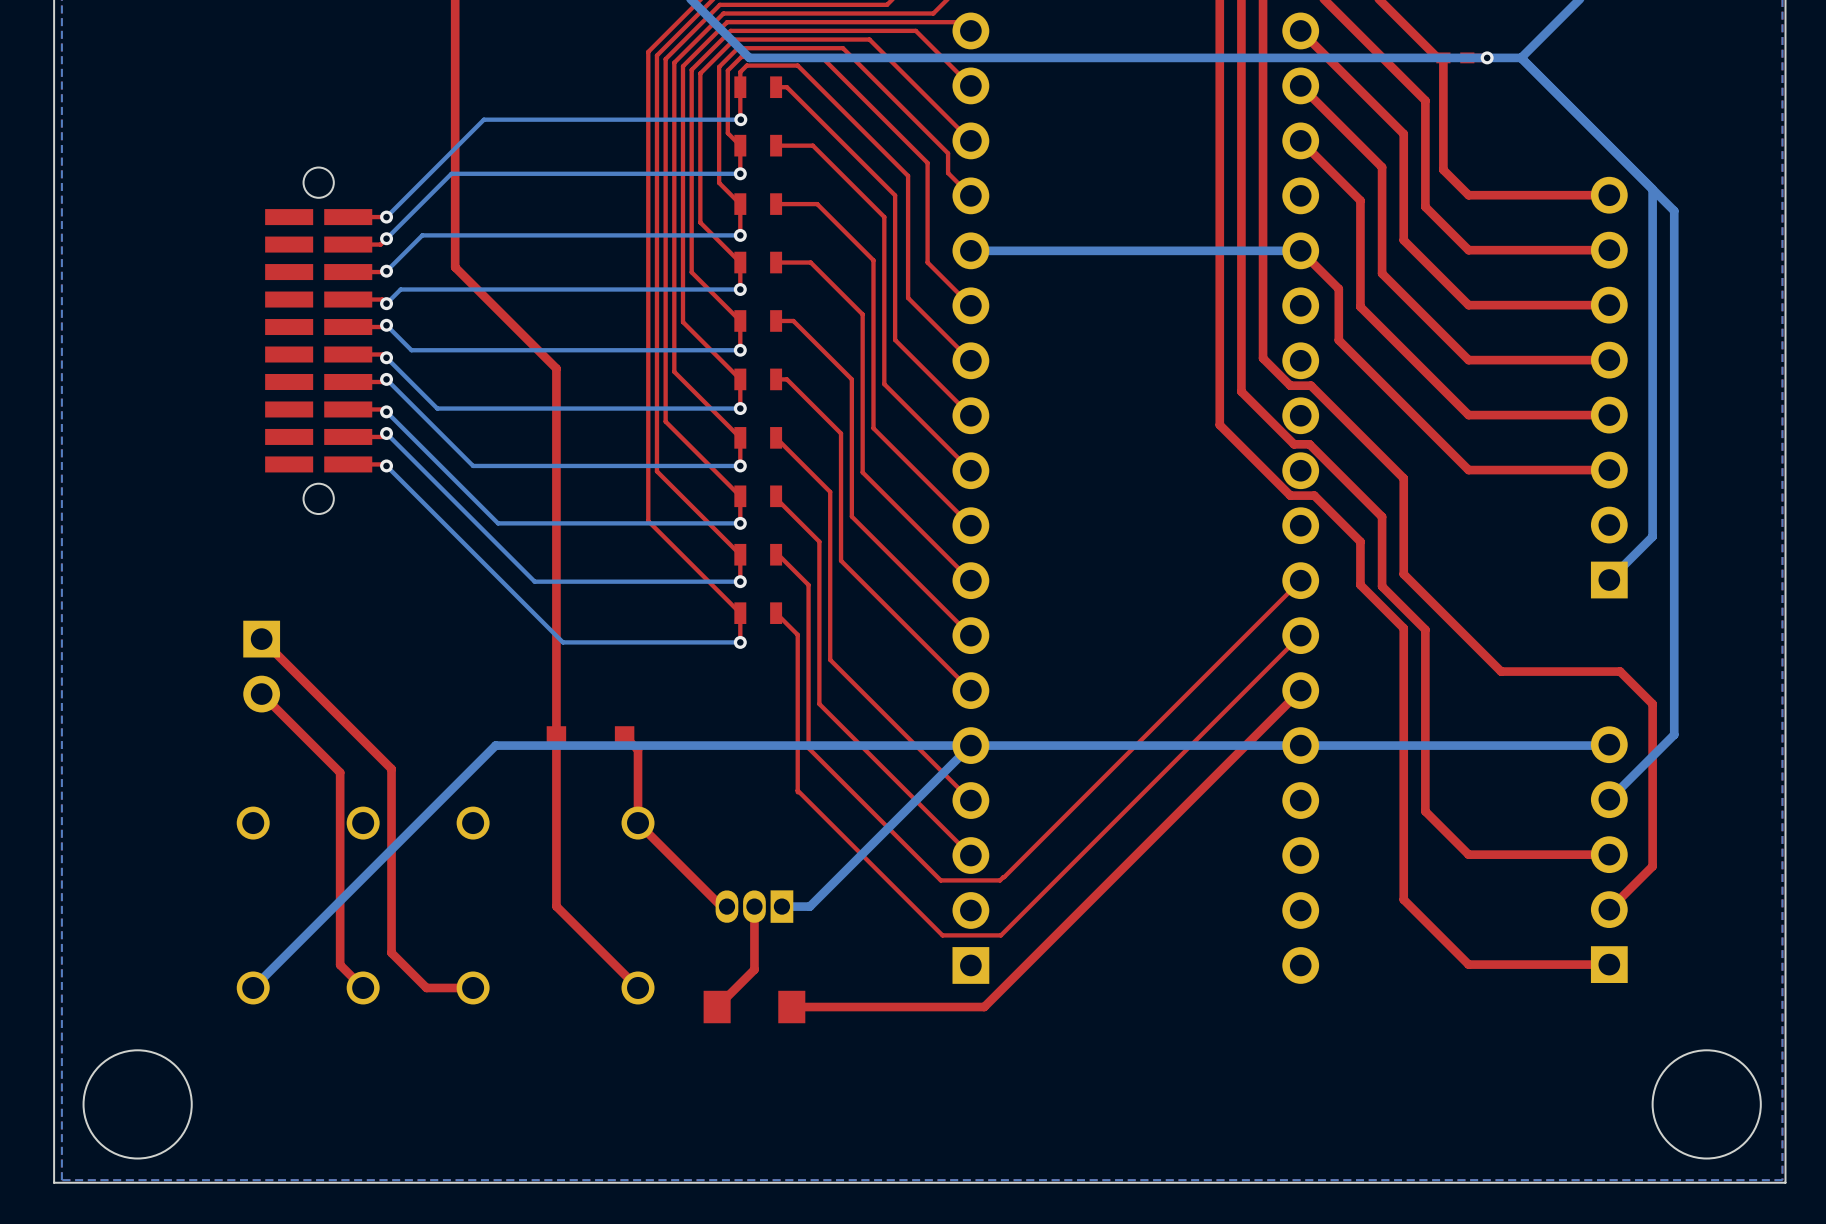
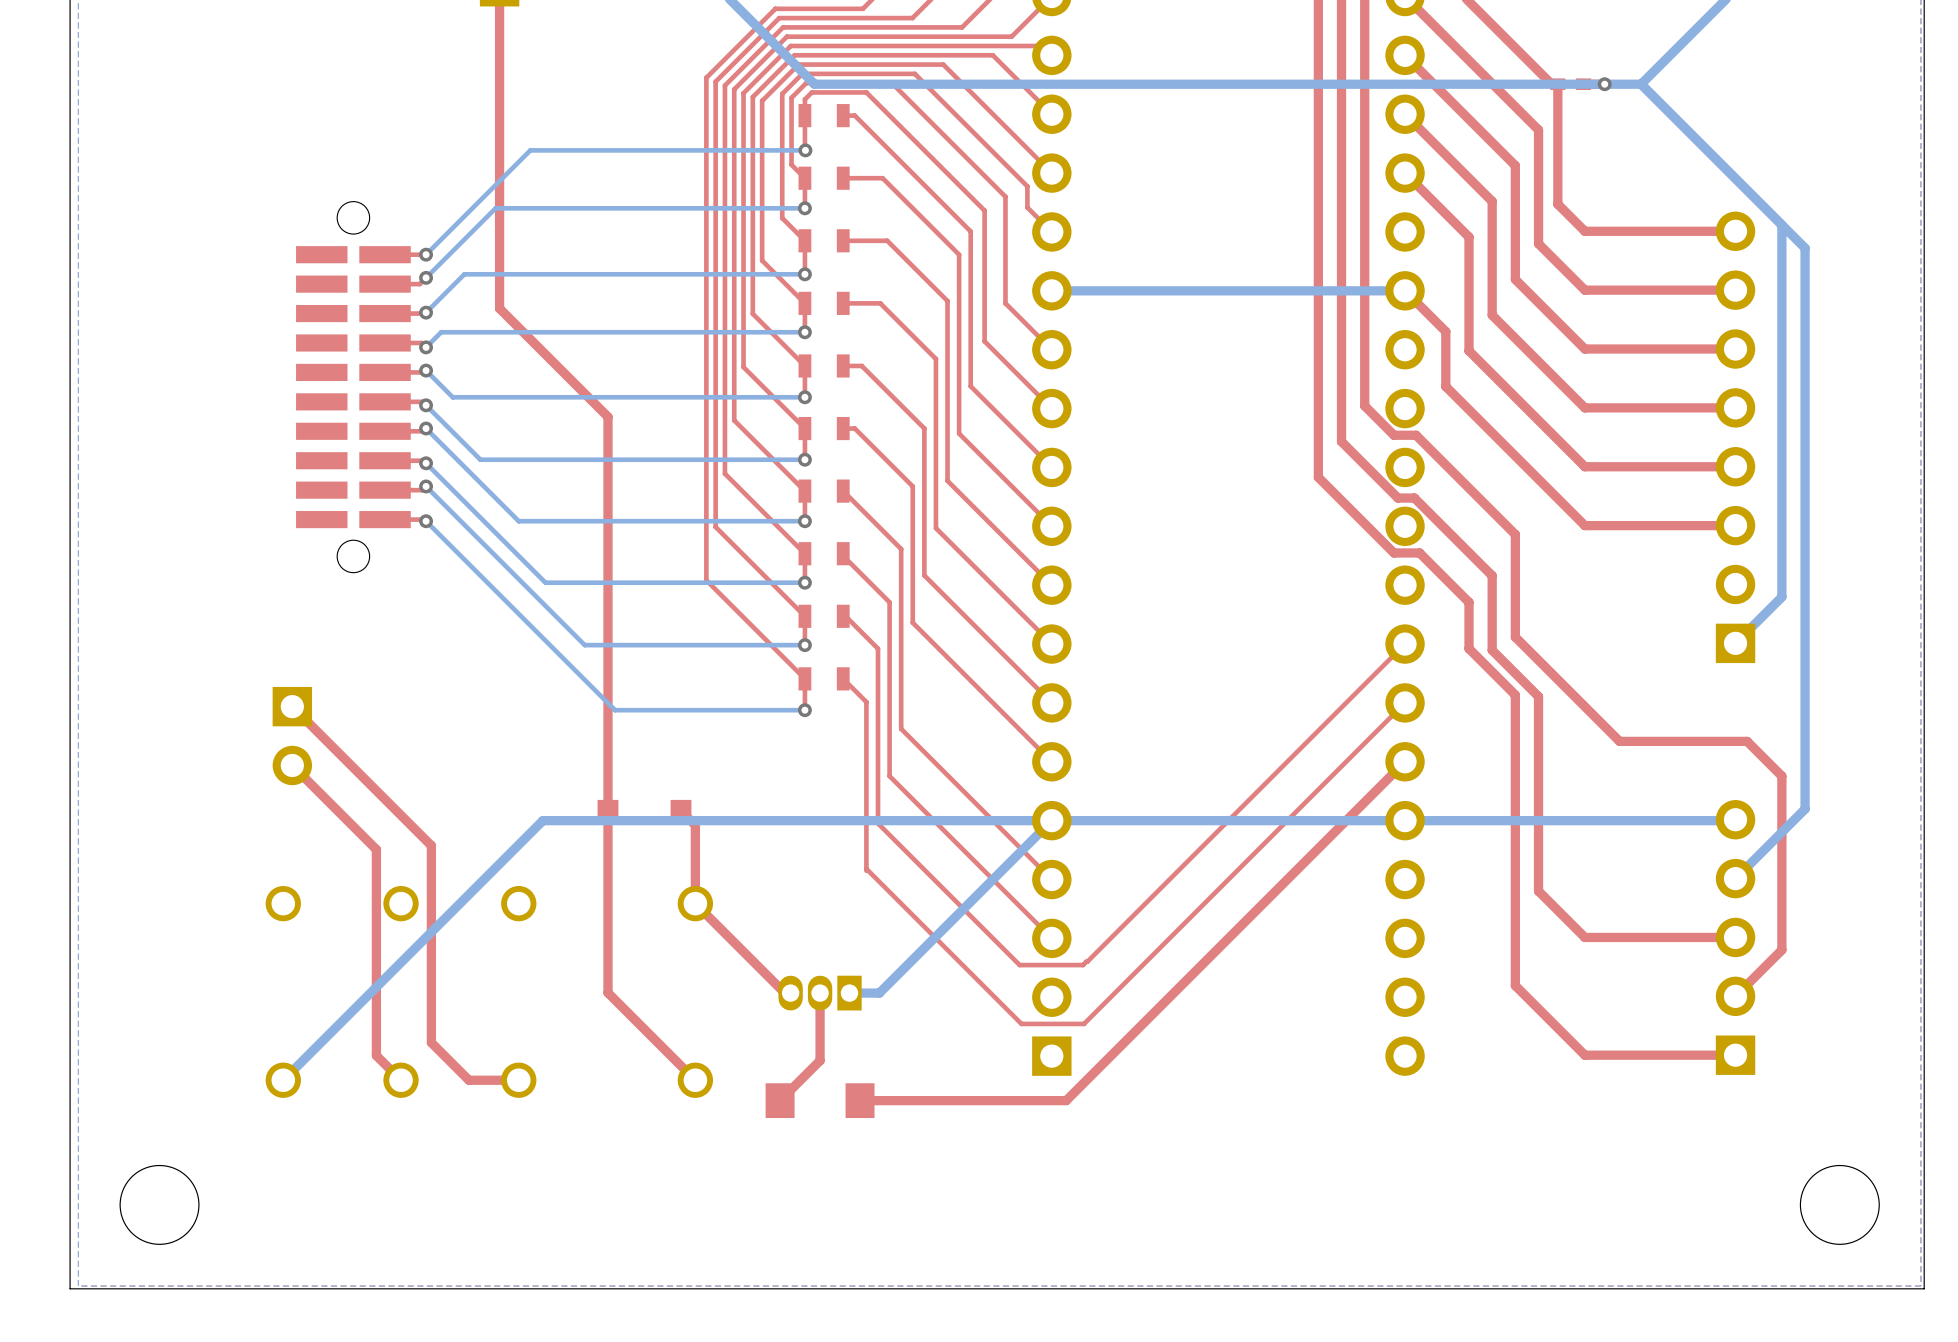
round board edge size: [83, 1049, 193, 1160] -> [119, 1164, 200, 1245]
round board edge size: [1652, 1049, 1762, 1160] -> [1799, 1164, 1880, 1245]

